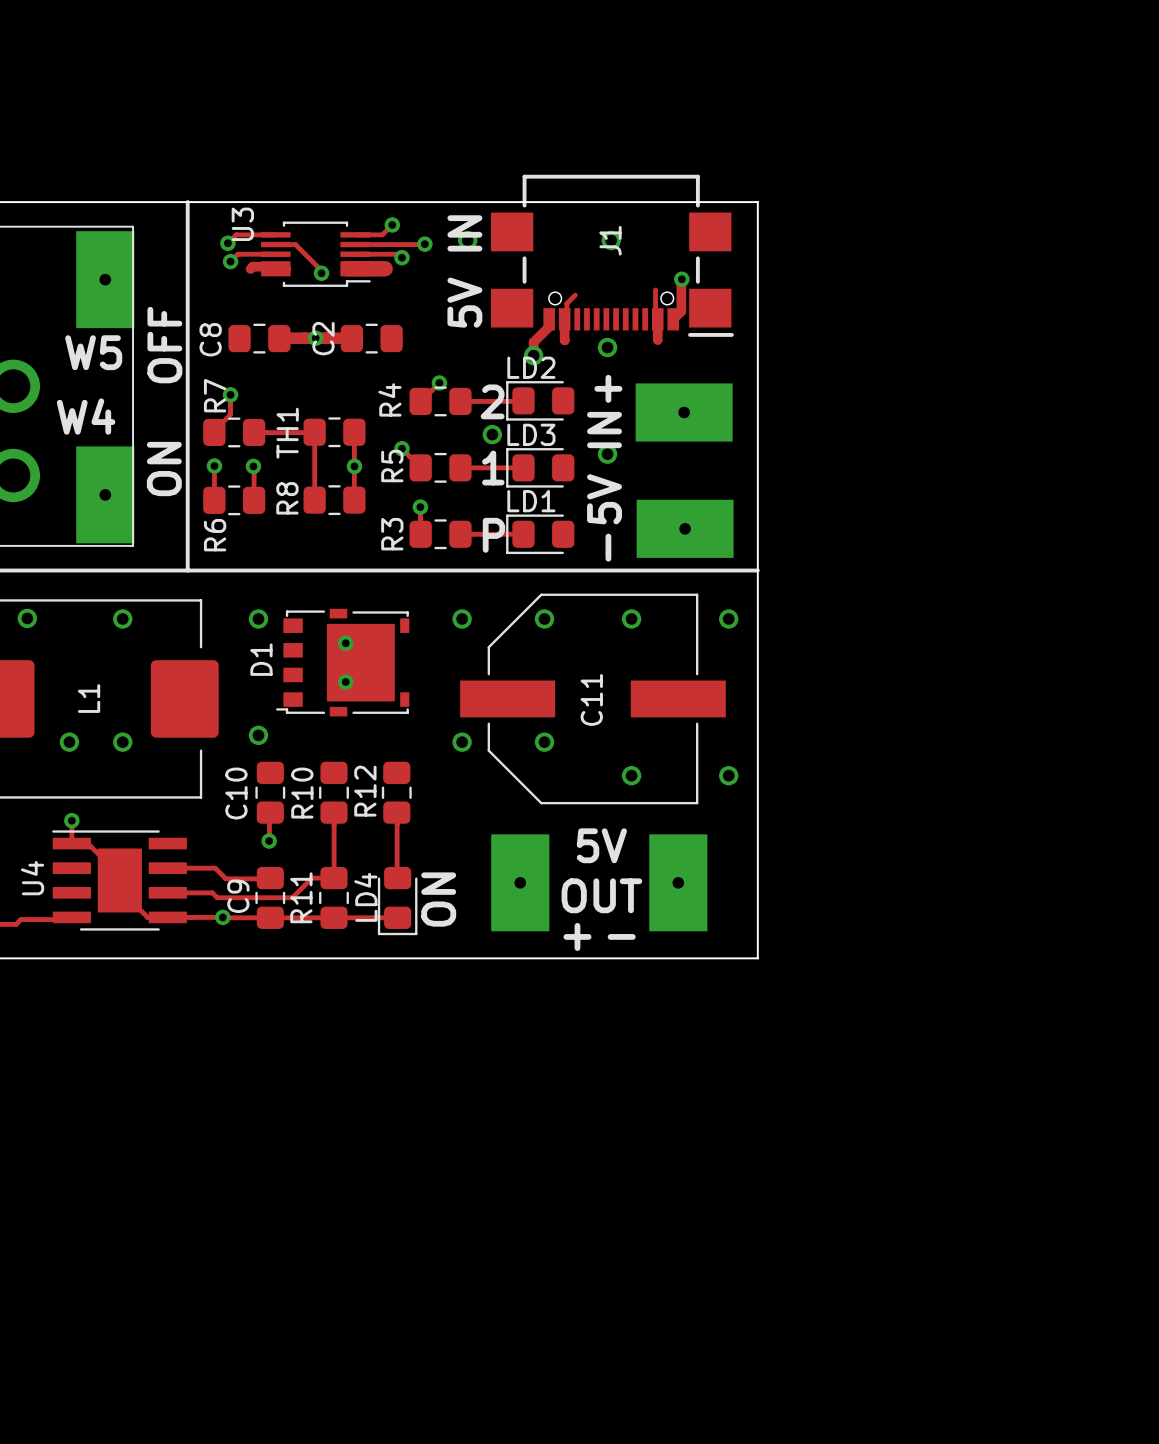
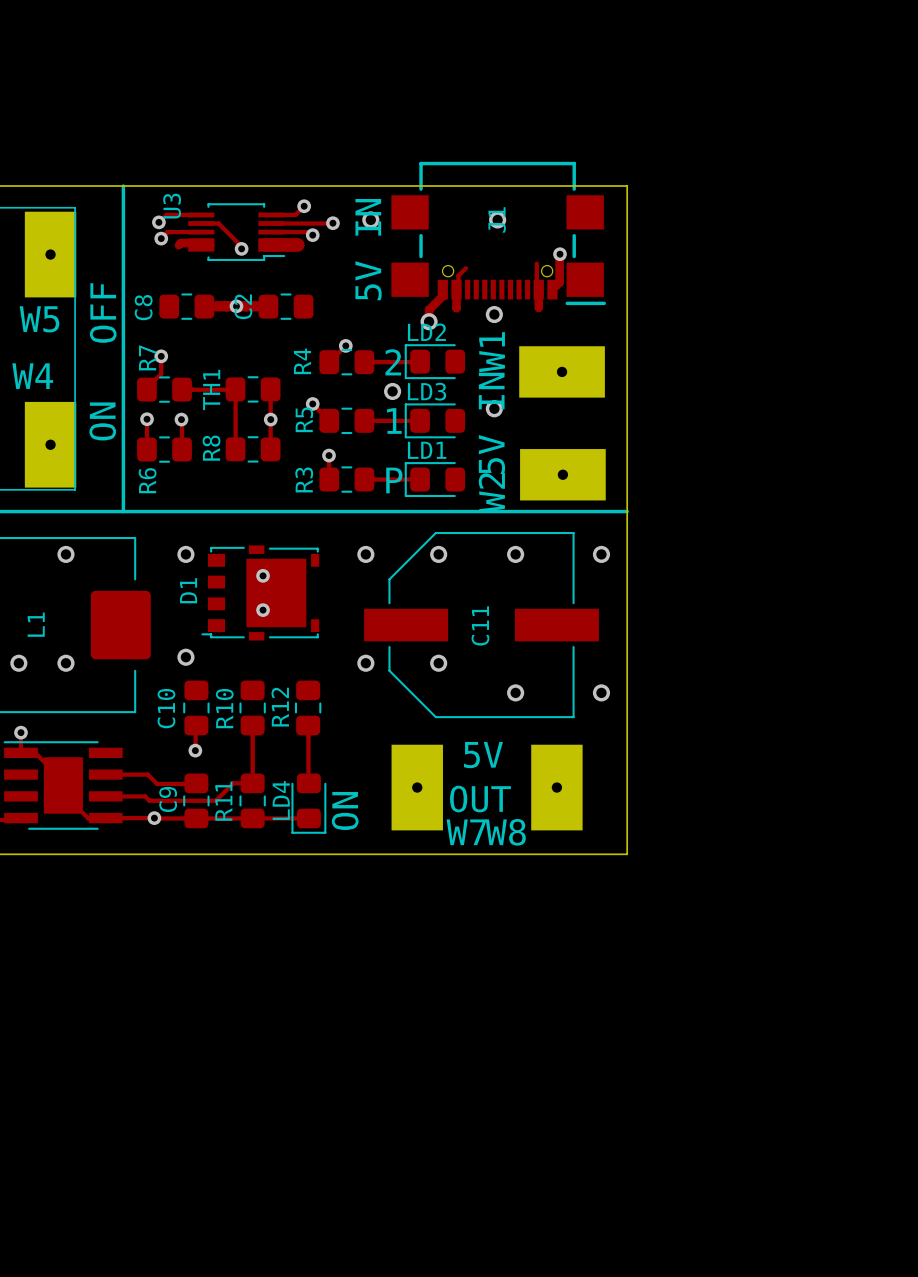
W1 name: + (608, 388) -> W1 (492, 352)
W2 name: - (608, 547) -> W2 (491, 492)
W7 name: + (577, 936) -> W7 (466, 832)
W8 name: - (621, 936) -> W8 (505, 832)

